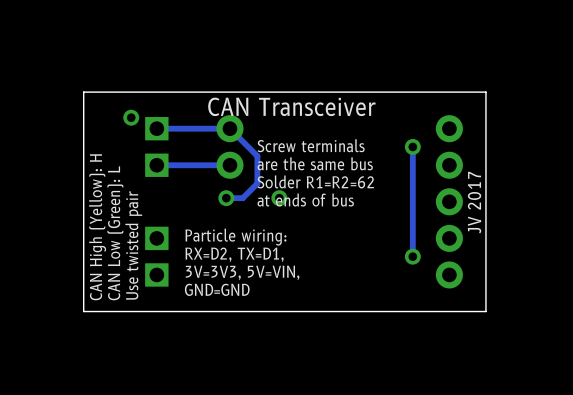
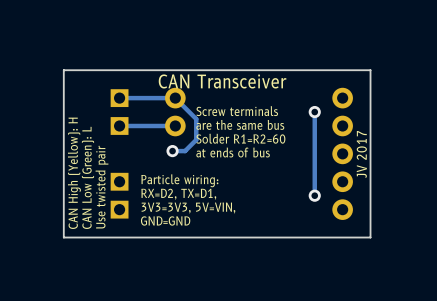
via: (131, 117) -> none
text: Solder R1=R2=62 (315, 181) -> Solder R1=R2=60 (240, 138)
via: (279, 198) -> none
text: 3V=3V3, 5V=VIN, (242, 272) -> 3V3=3V3, 5V=VIN, (188, 208)

